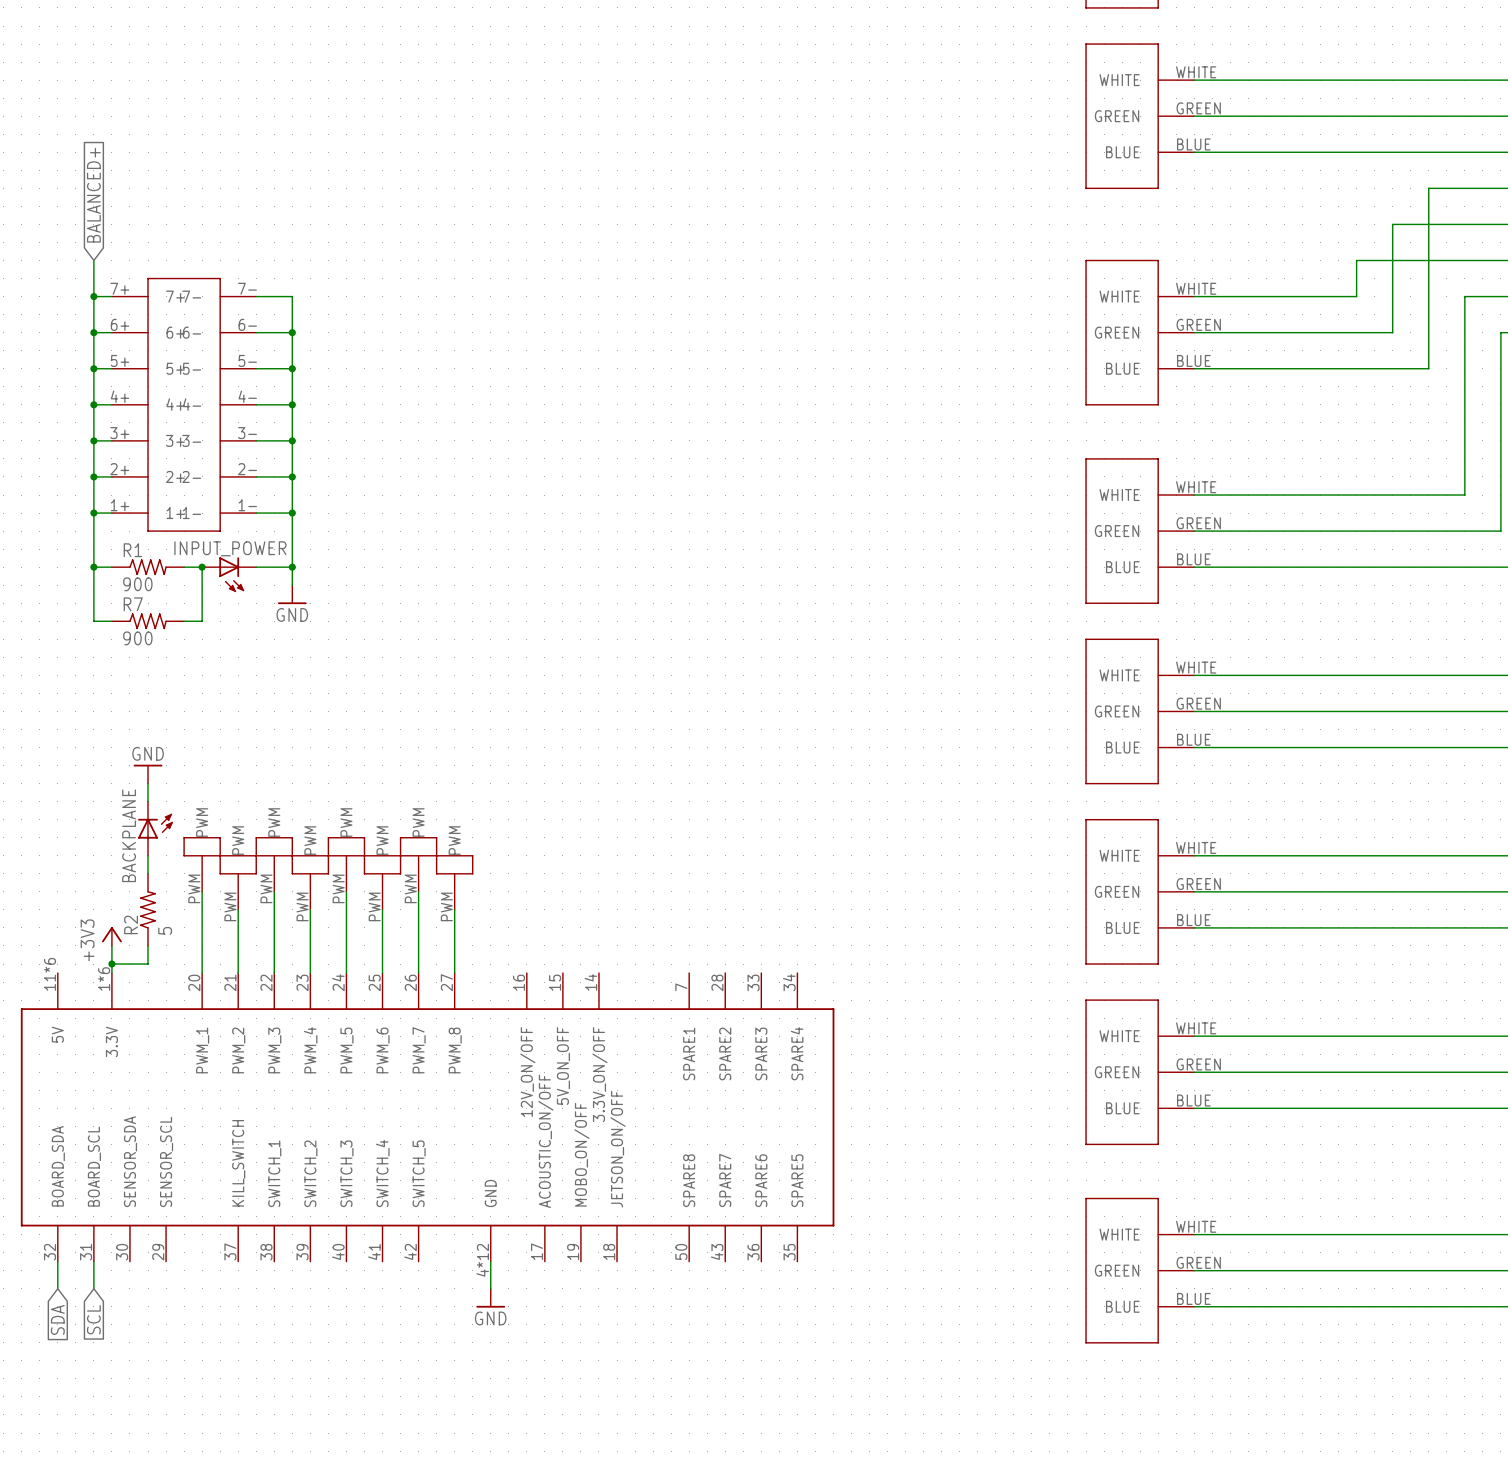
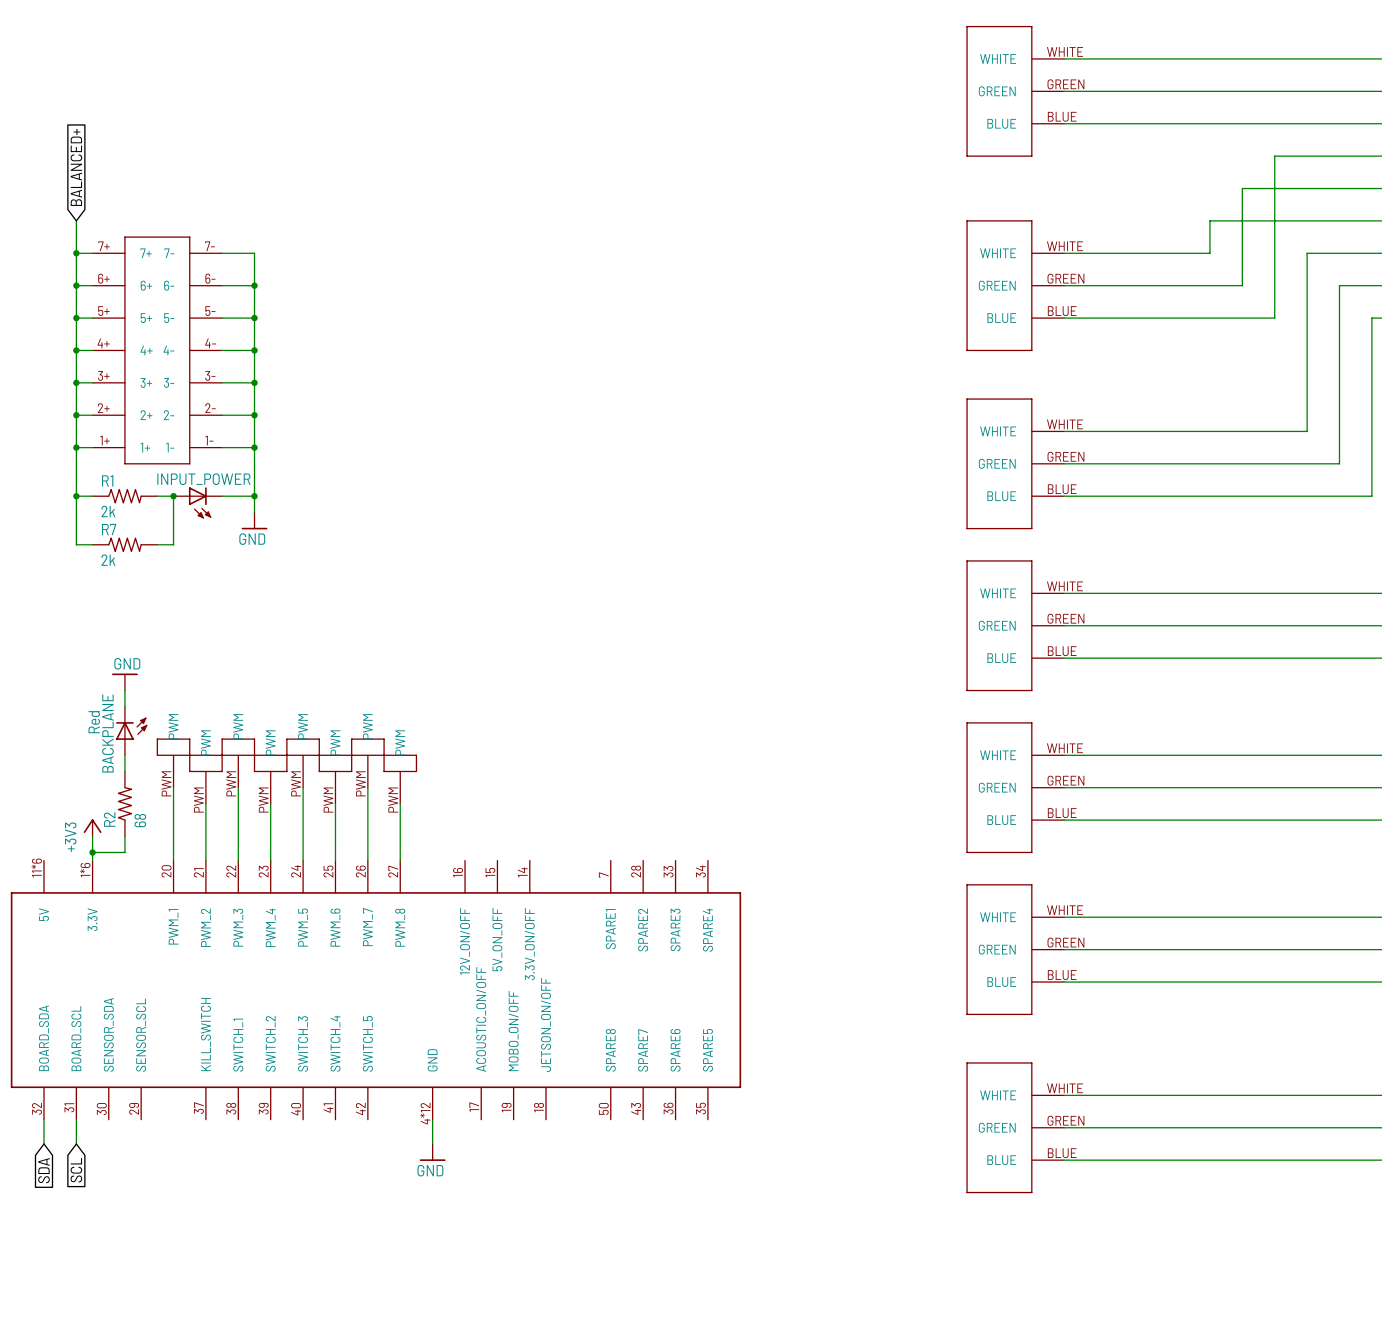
R1 value: 900 (137, 584) -> 2k (108, 511)
R7 value: 900 (137, 638) -> 2k (108, 560)
BACKPLANE value: none -> Red (94, 722)
R2 value: 5 (165, 930) -> 68 (140, 820)

